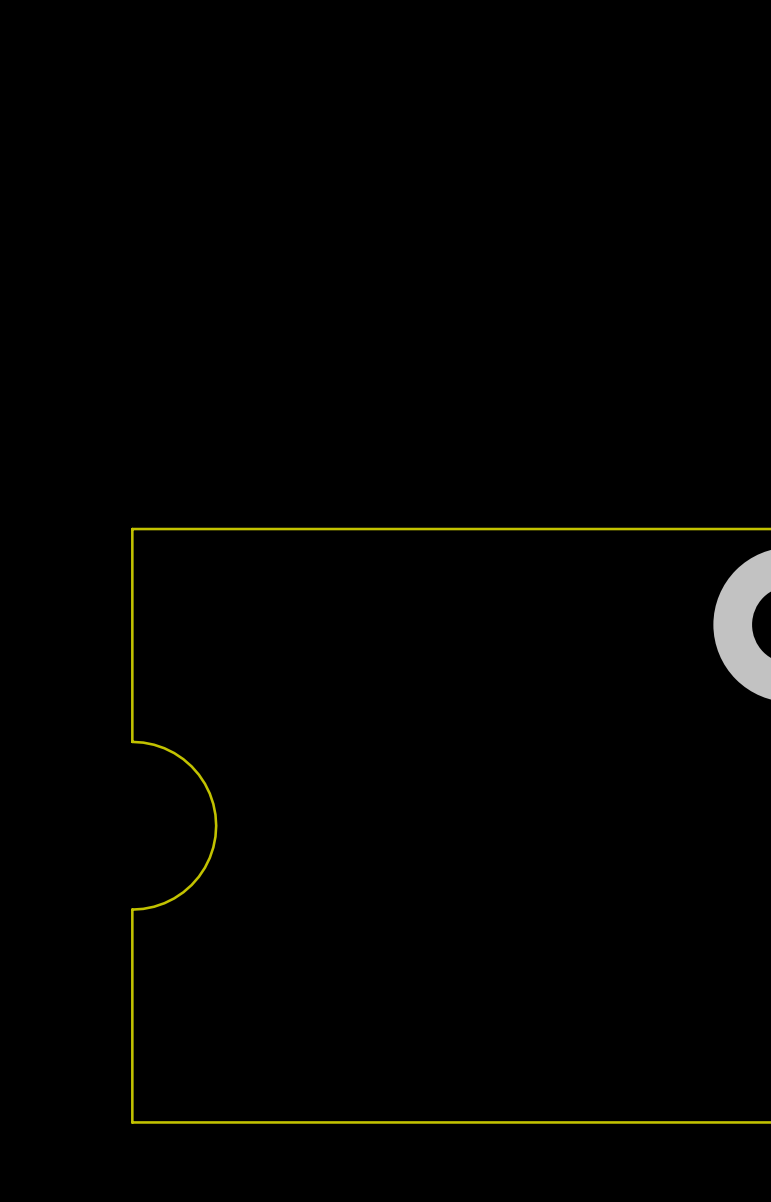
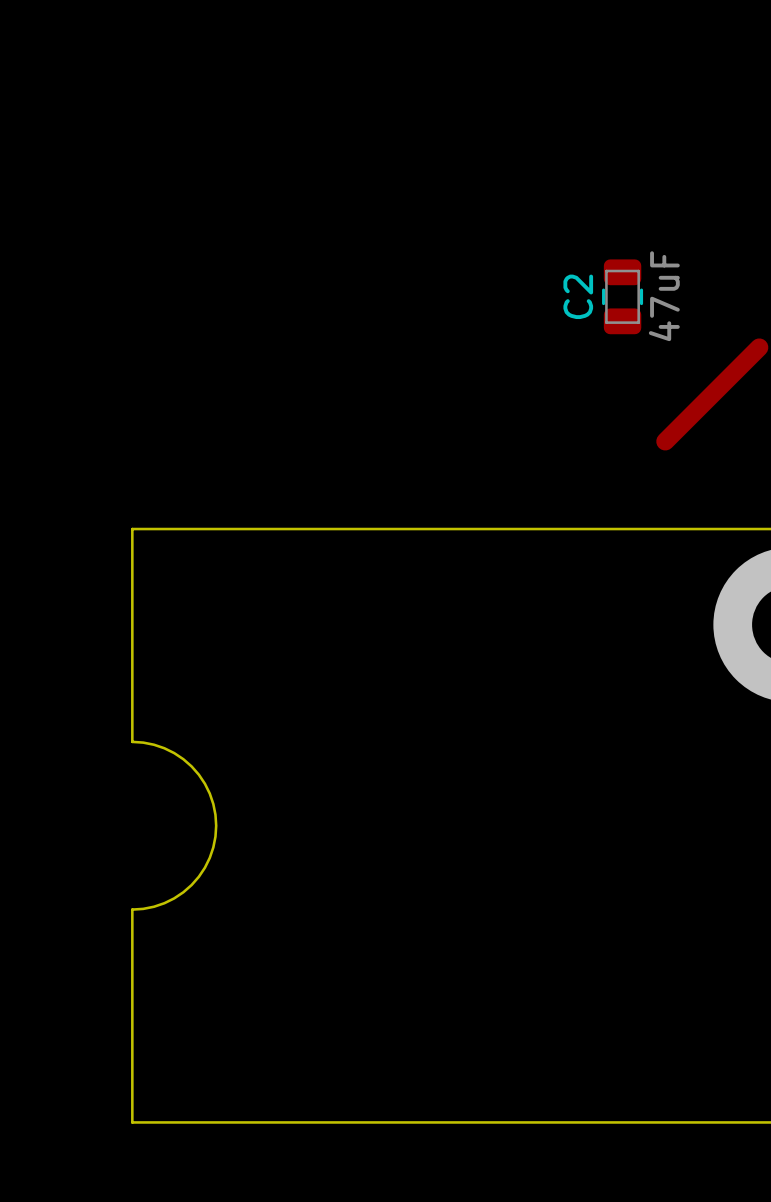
C2: none -> 47uF (622, 296)
top track: none -> (759, 347) (665, 441)

